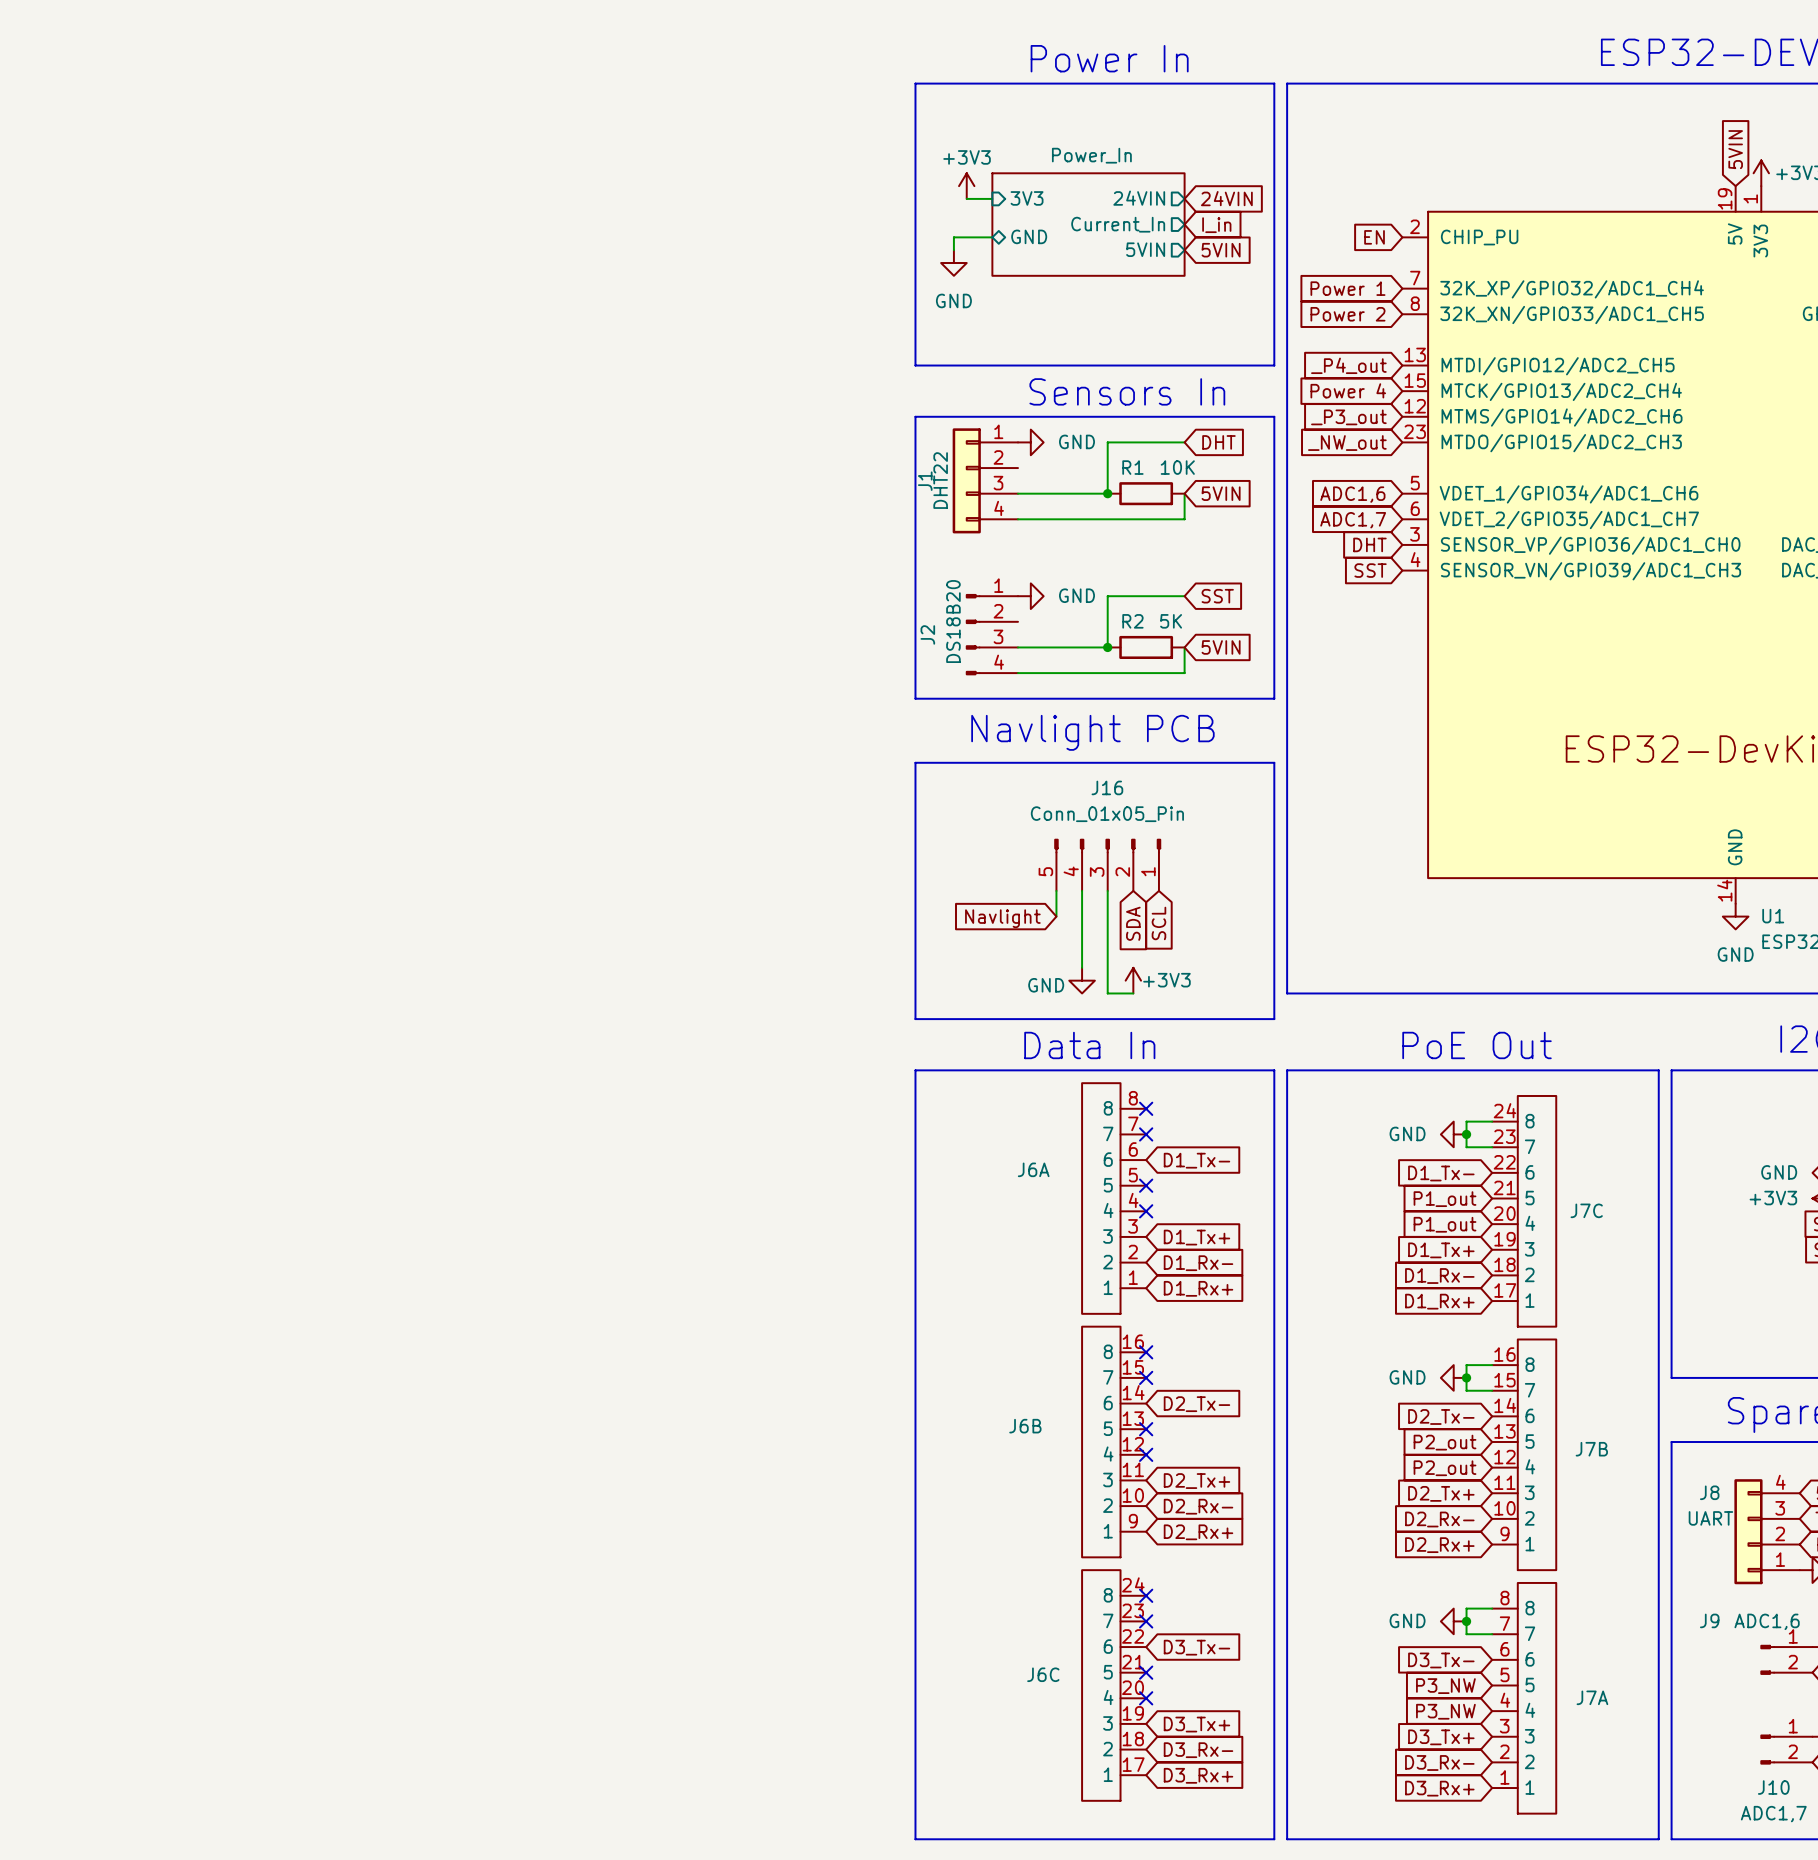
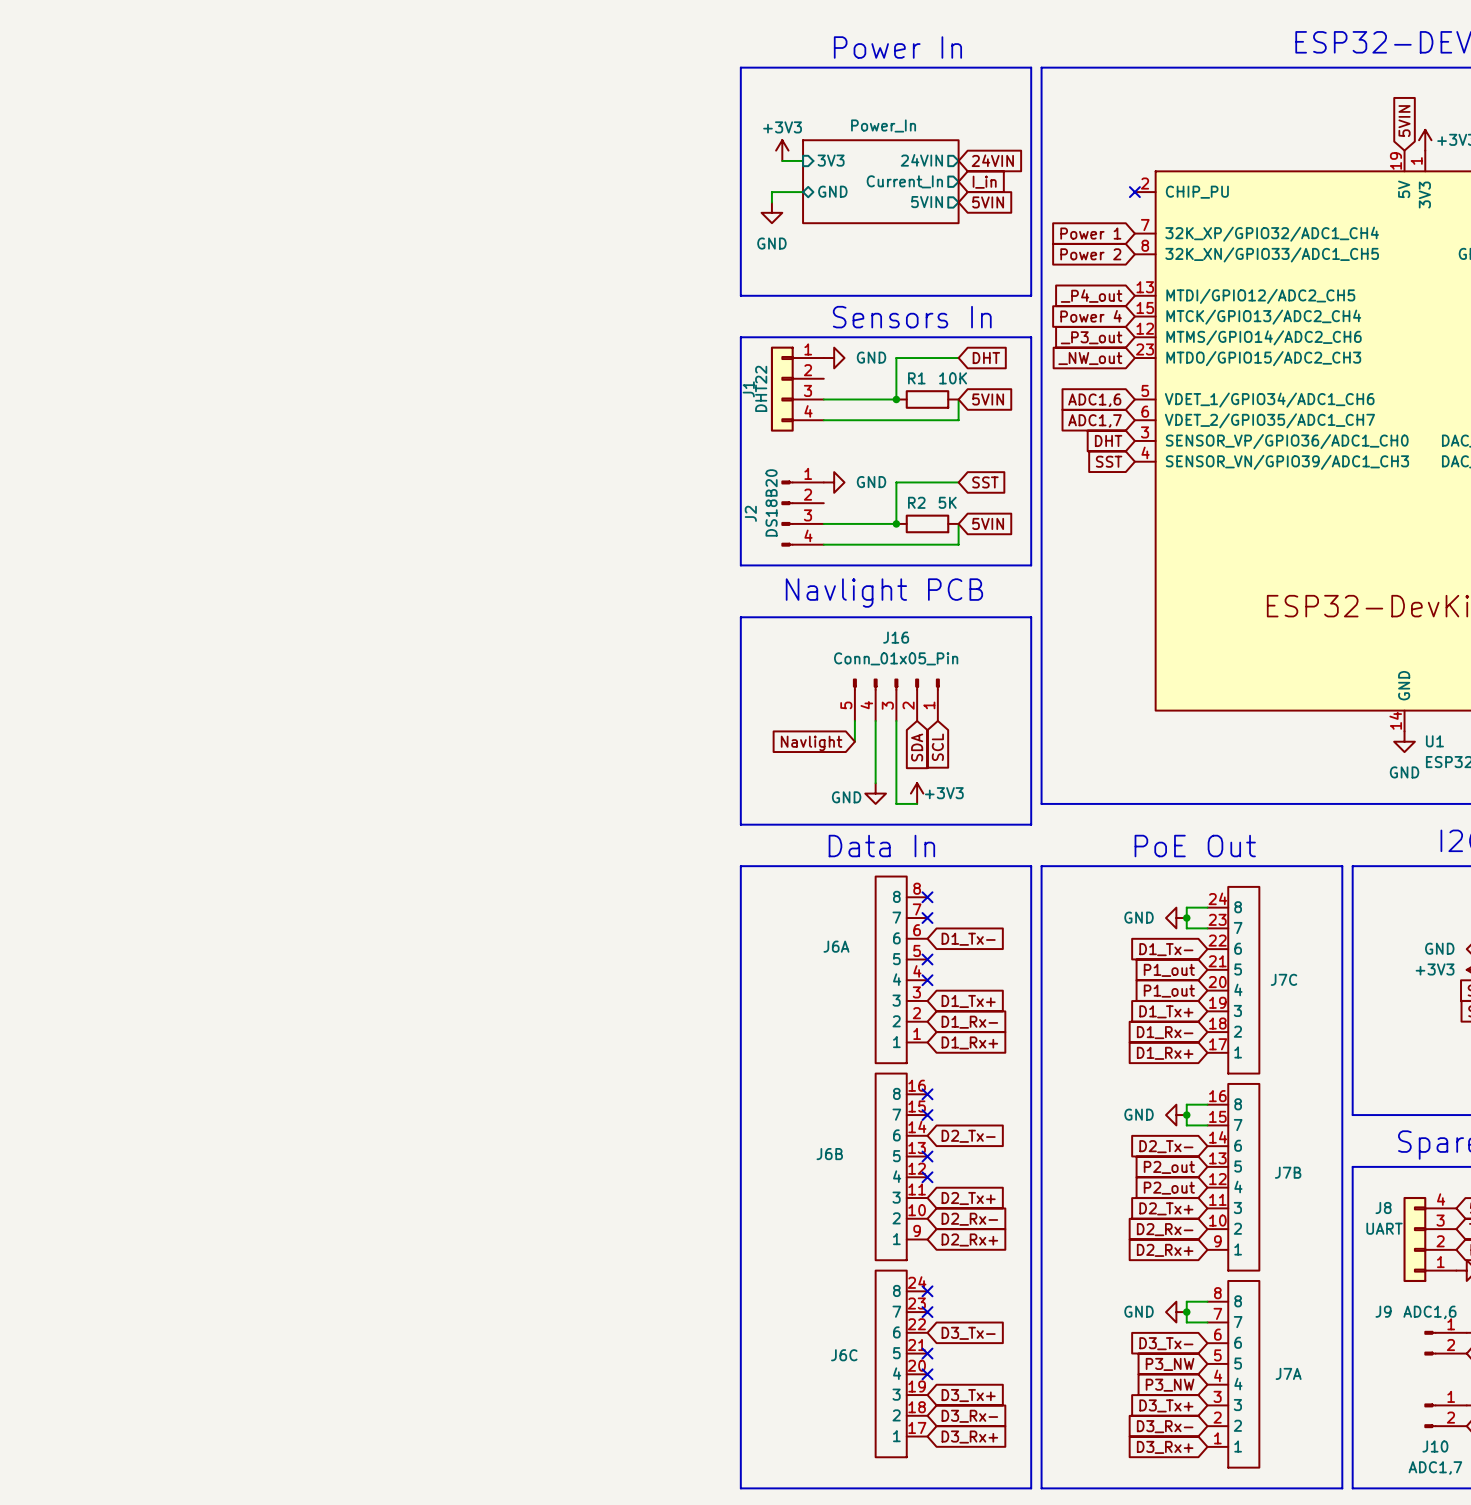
global label: EN (1374, 237) -> none
no-connect mark: none -> (1134, 192)

